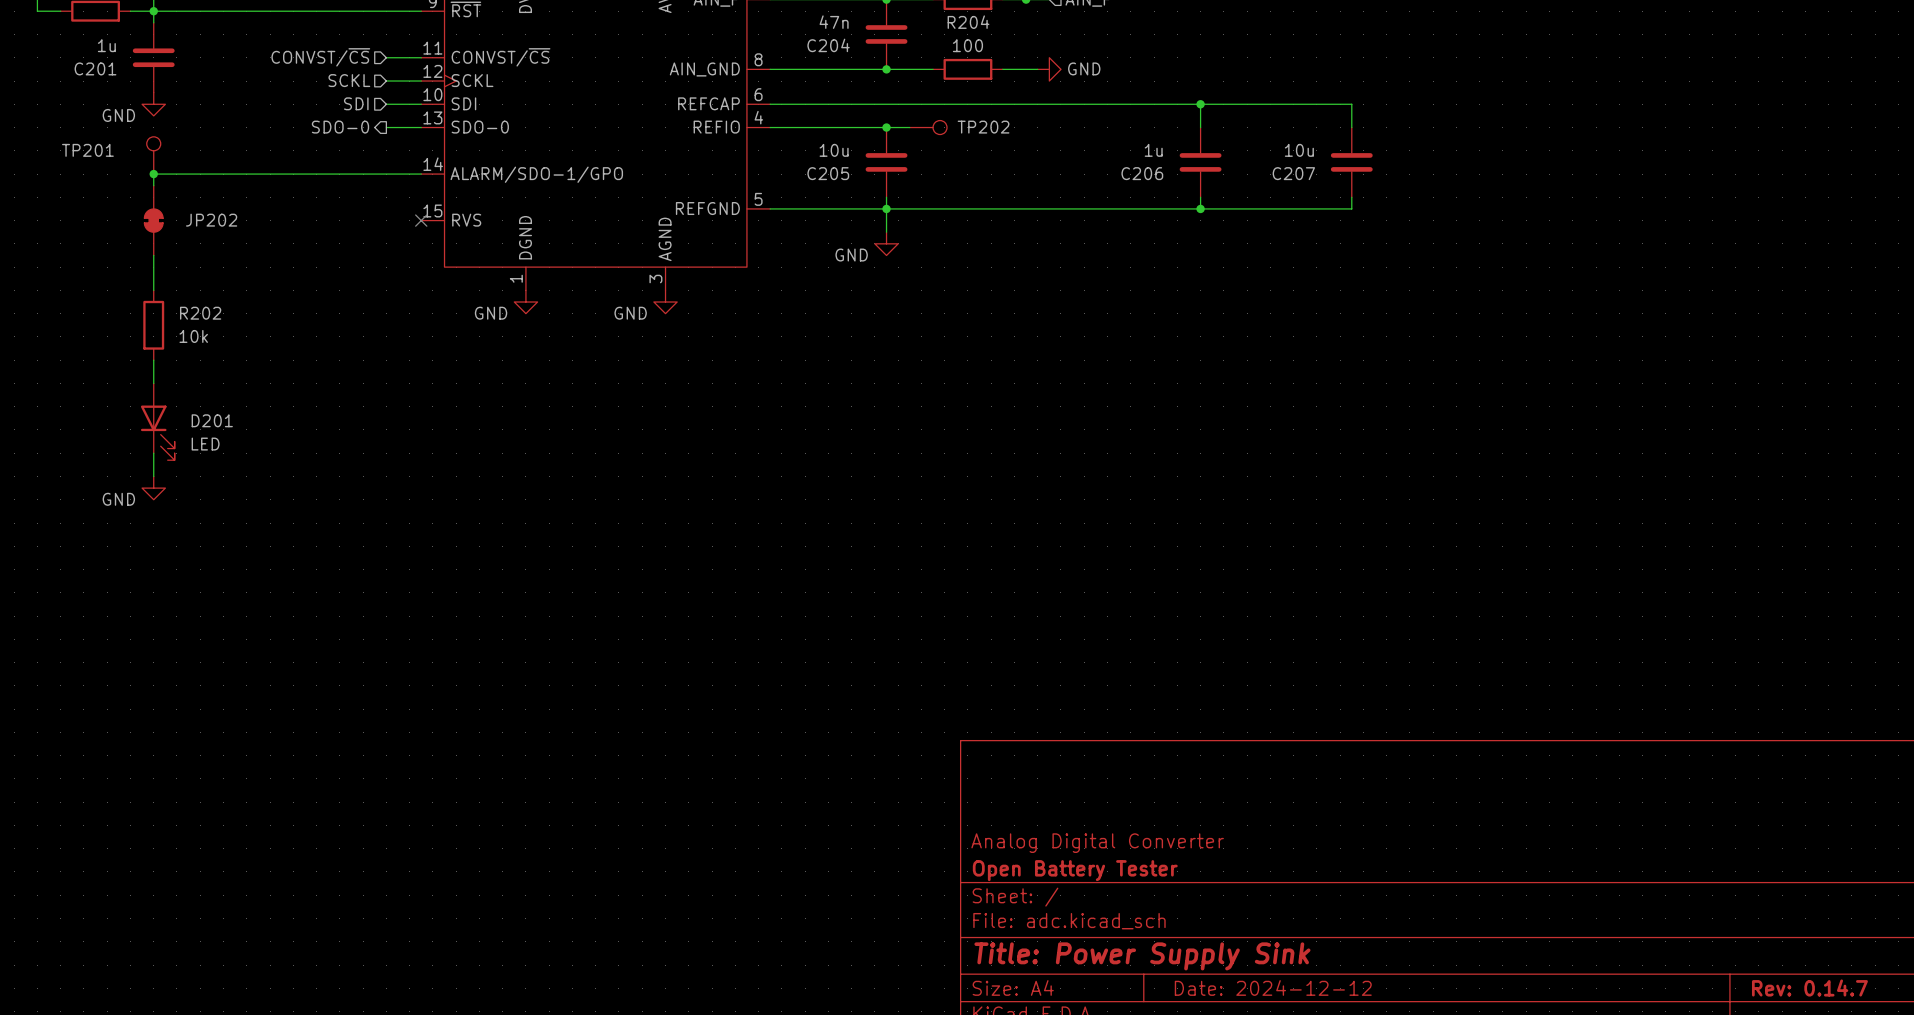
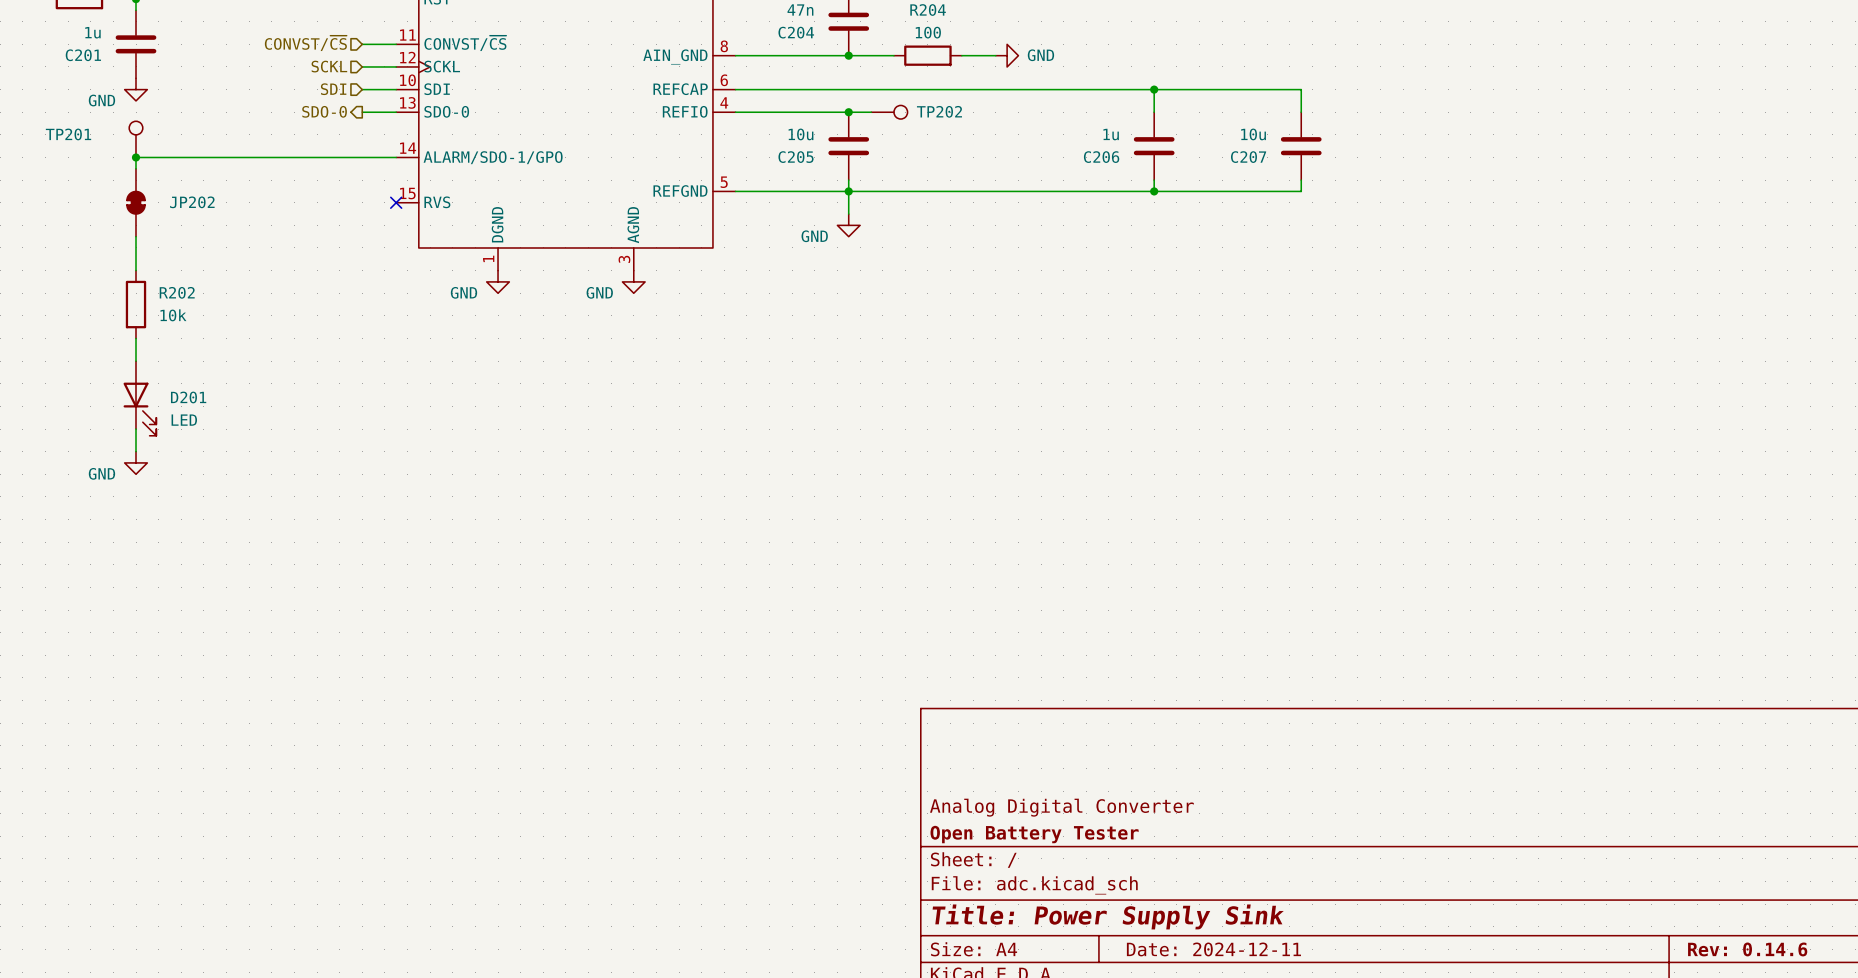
title block: Date: 2024-12-12 (1273, 987) -> Date: 2024-12-11 (1213, 949)
title block: Rev: 0.14.7 (1809, 987) -> Rev: 0.14.6 (1747, 949)

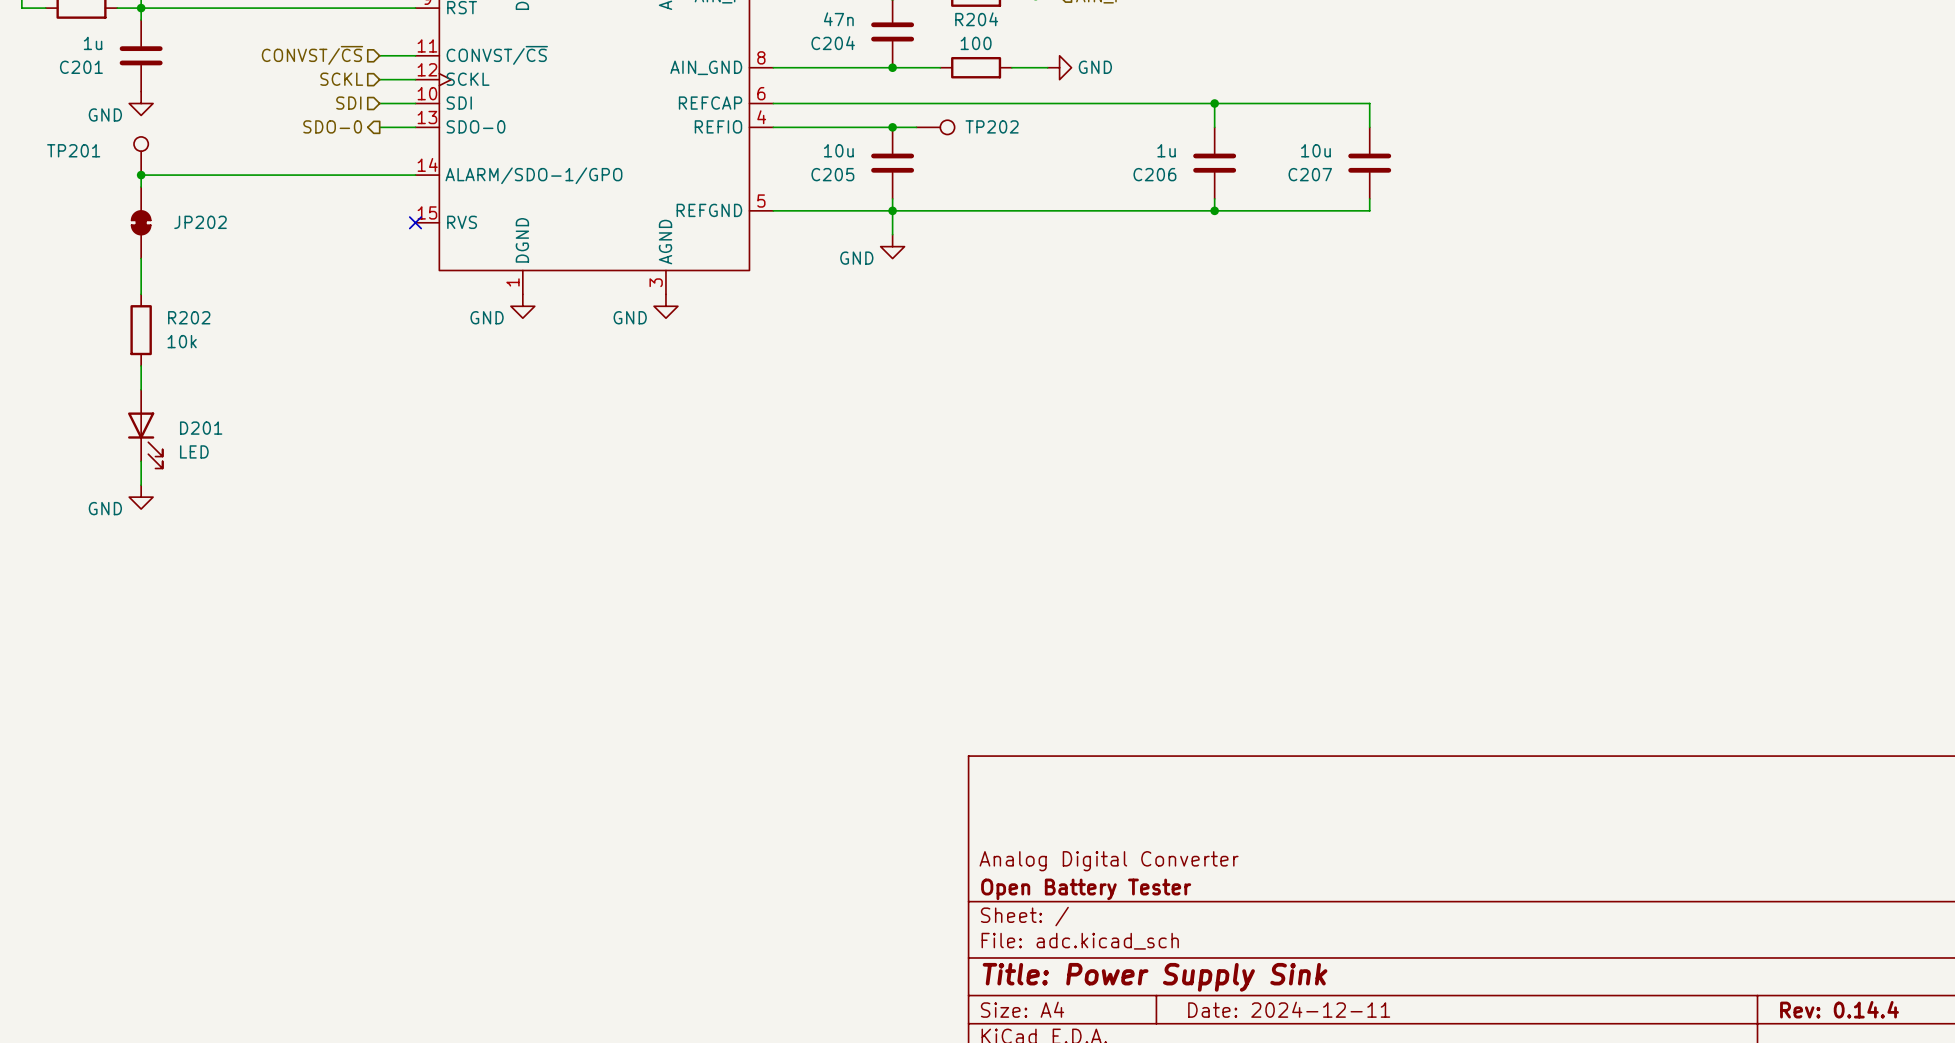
title block: Rev: 0.14.6 (1747, 949) -> Rev: 0.14.4 (1839, 1009)

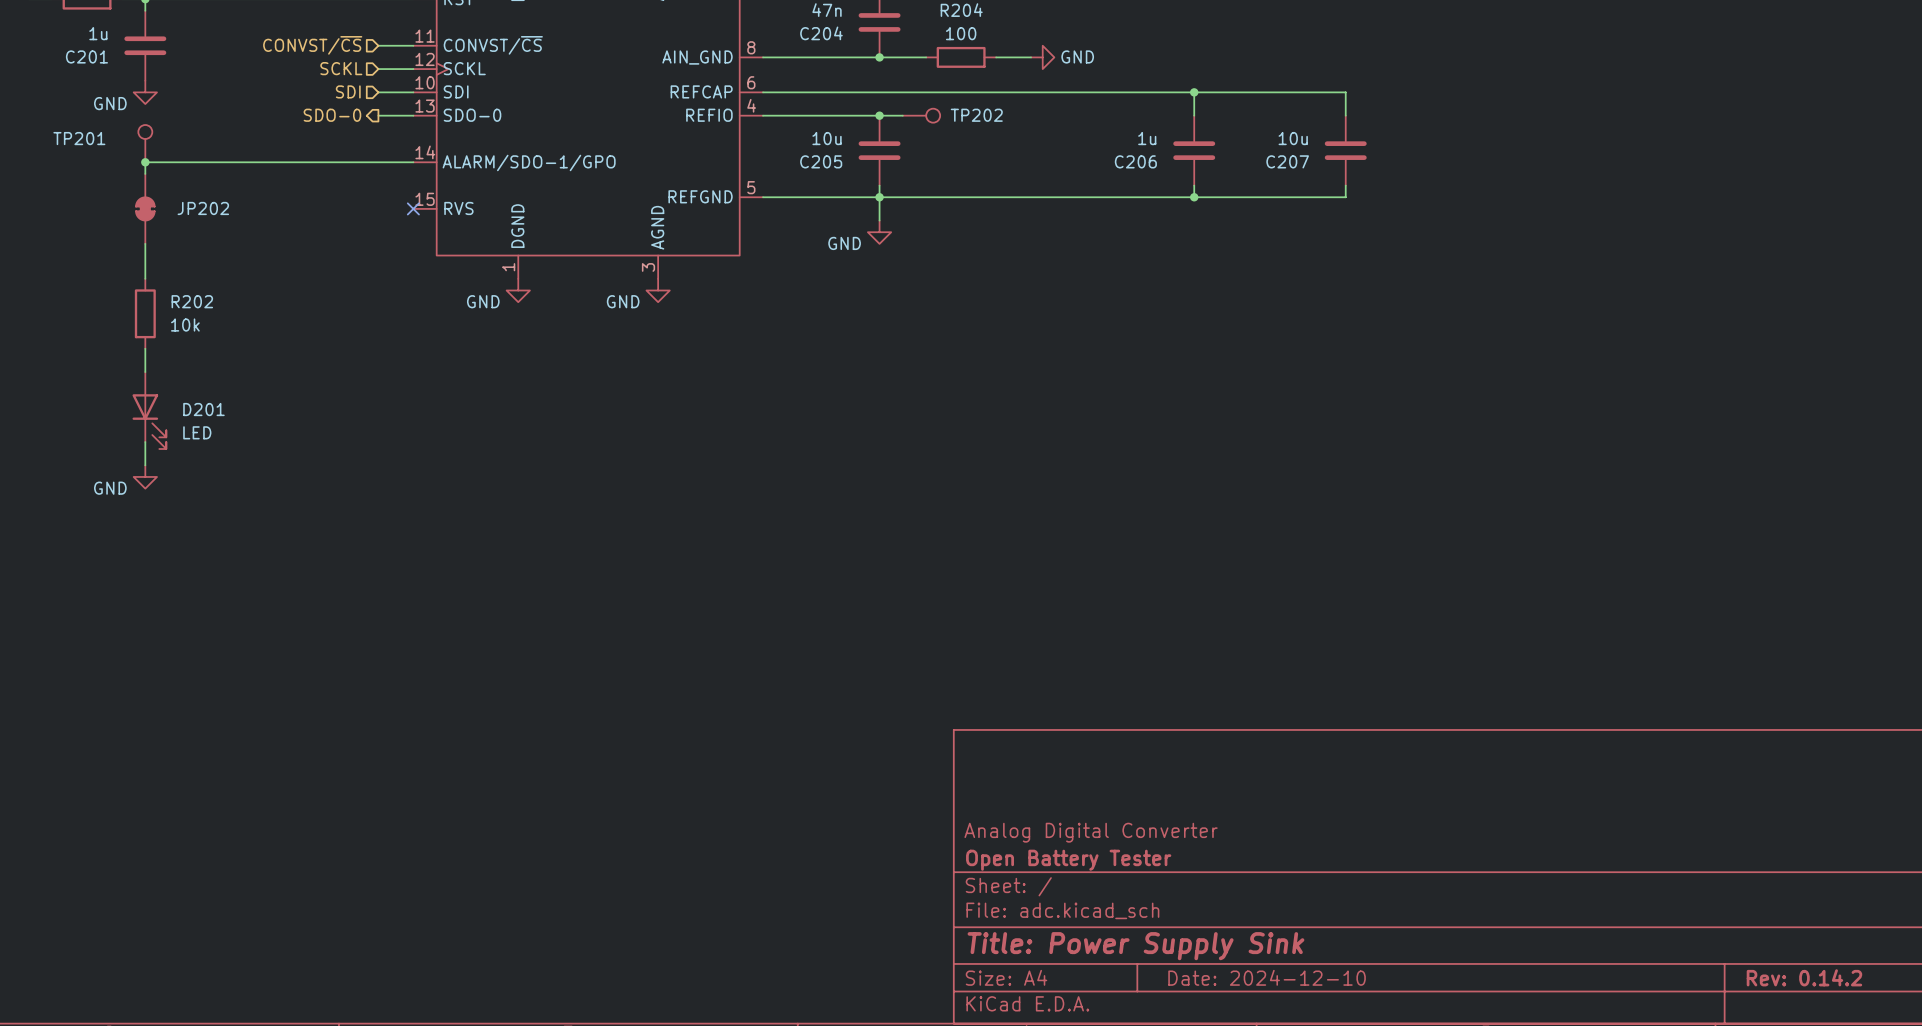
title block: Date: 2024-12-11 (1289, 1009) -> Date: 2024-12-10 (1267, 977)
title block: Rev: 0.14.4 (1839, 1009) -> Rev: 0.14.2 (1804, 977)

